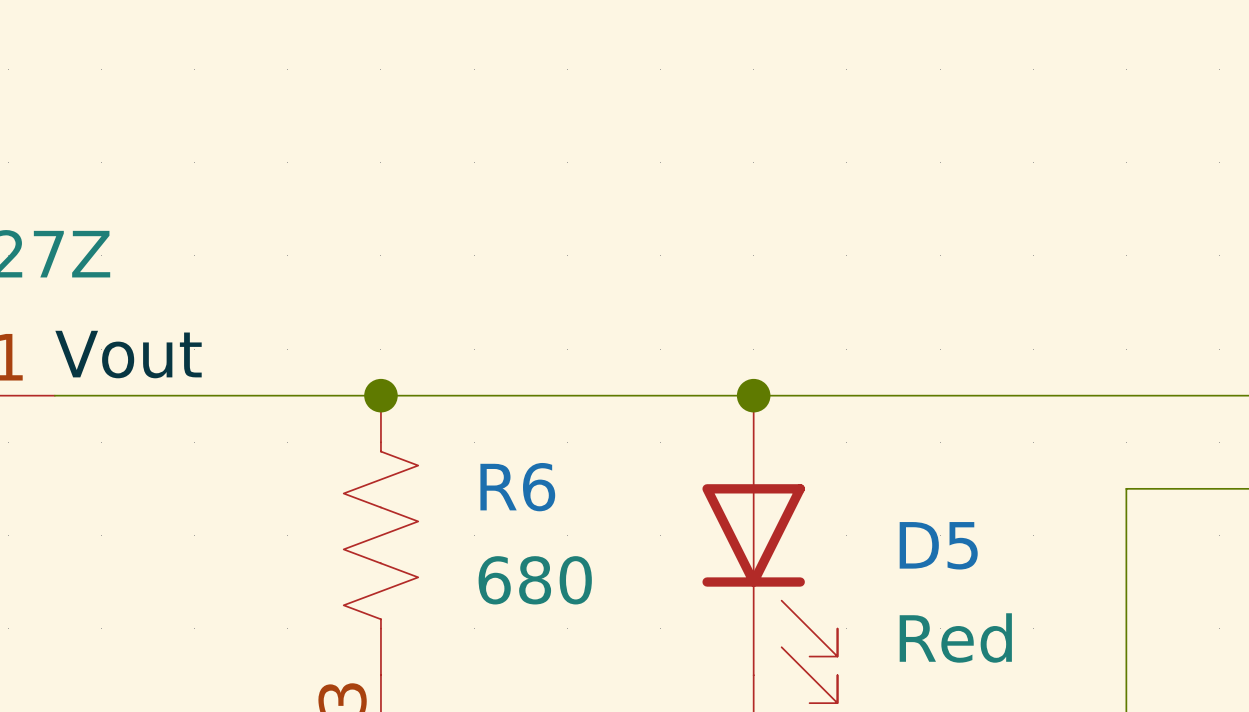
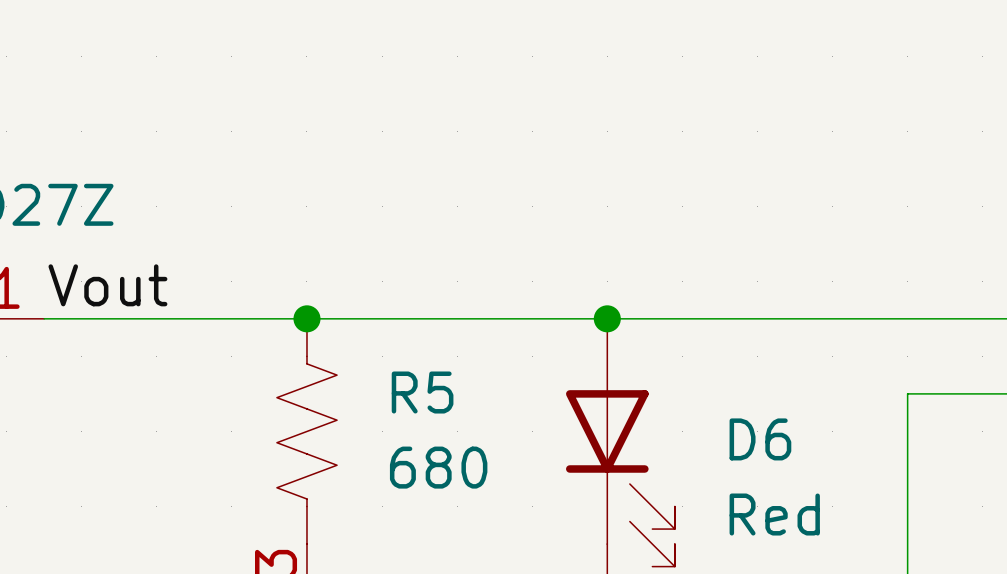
R6 name: R6 (517, 487) -> R5 (422, 392)
D5 name: D5 (938, 545) -> D6 (760, 439)

